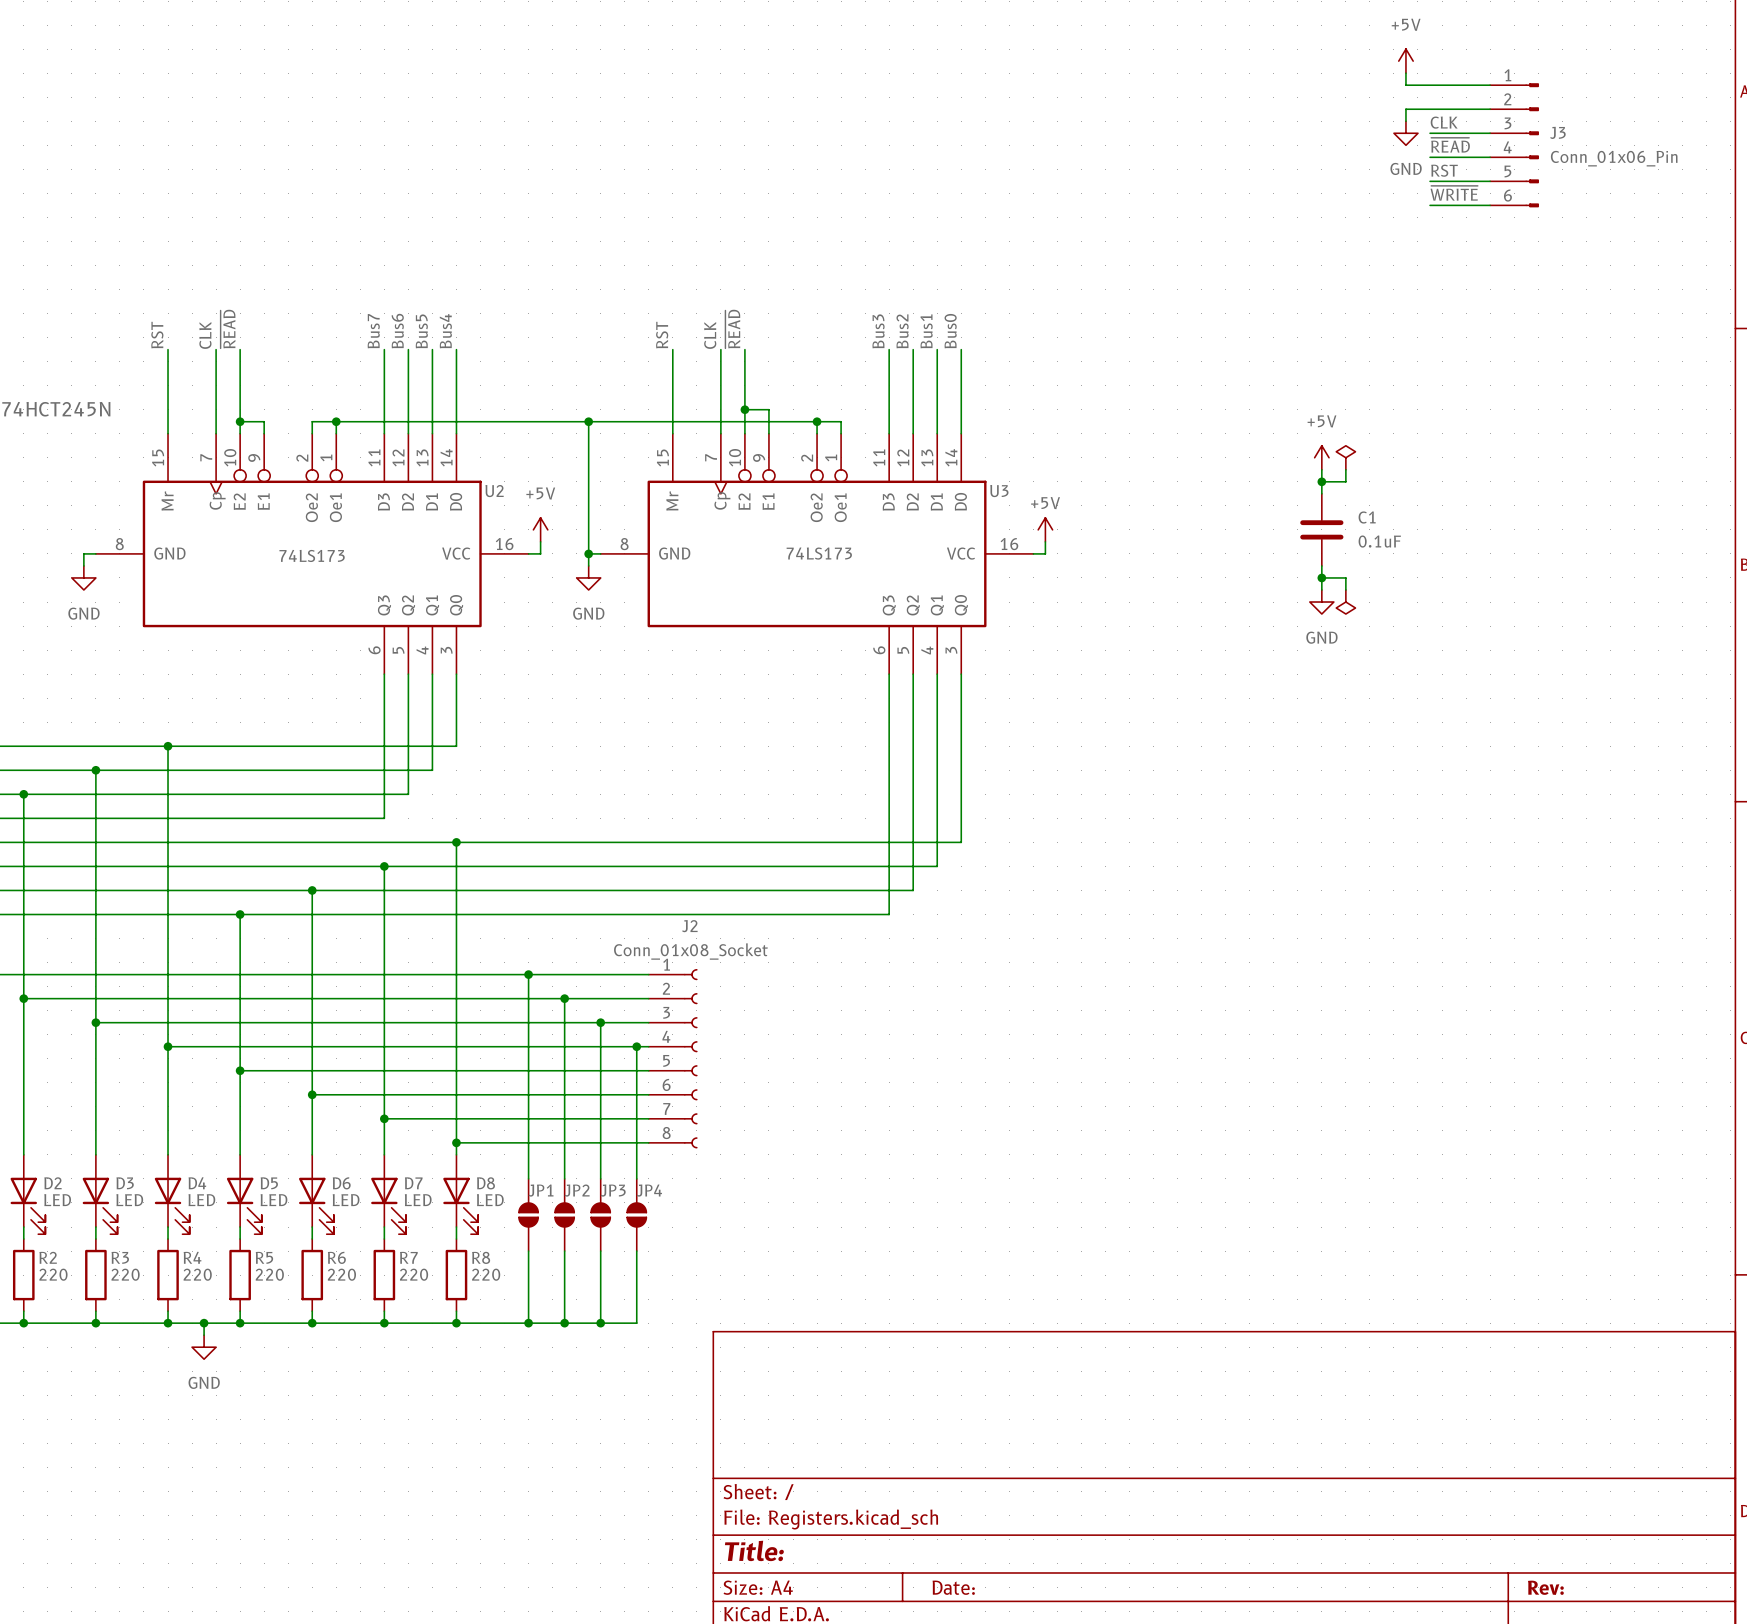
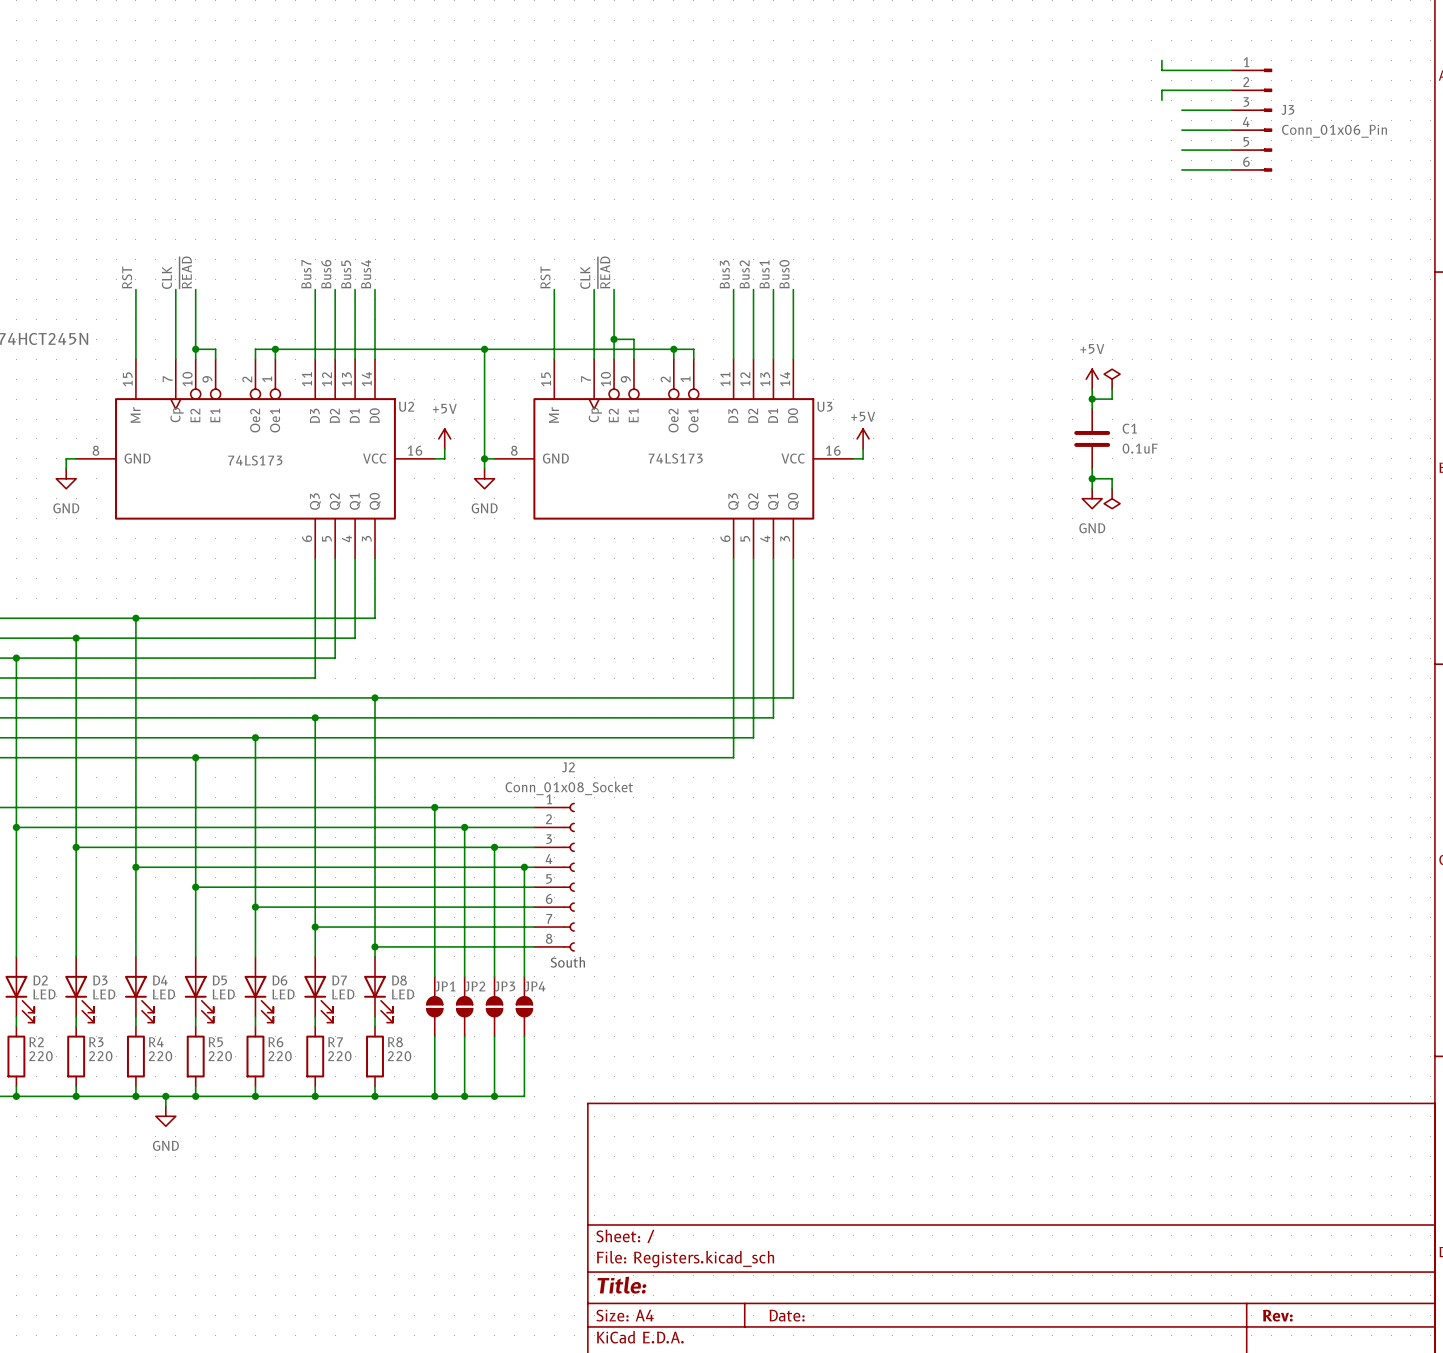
power symbol: +5V (1405, 61) -> none
label: CLK (1444, 122) -> none
power symbol: GND (1405, 133) -> none
label: ~{READ} (1450, 145) -> none
label: RST (1444, 170) -> none
label: ~{WRITE} (1454, 193) -> none
text: none -> South (567, 962)

